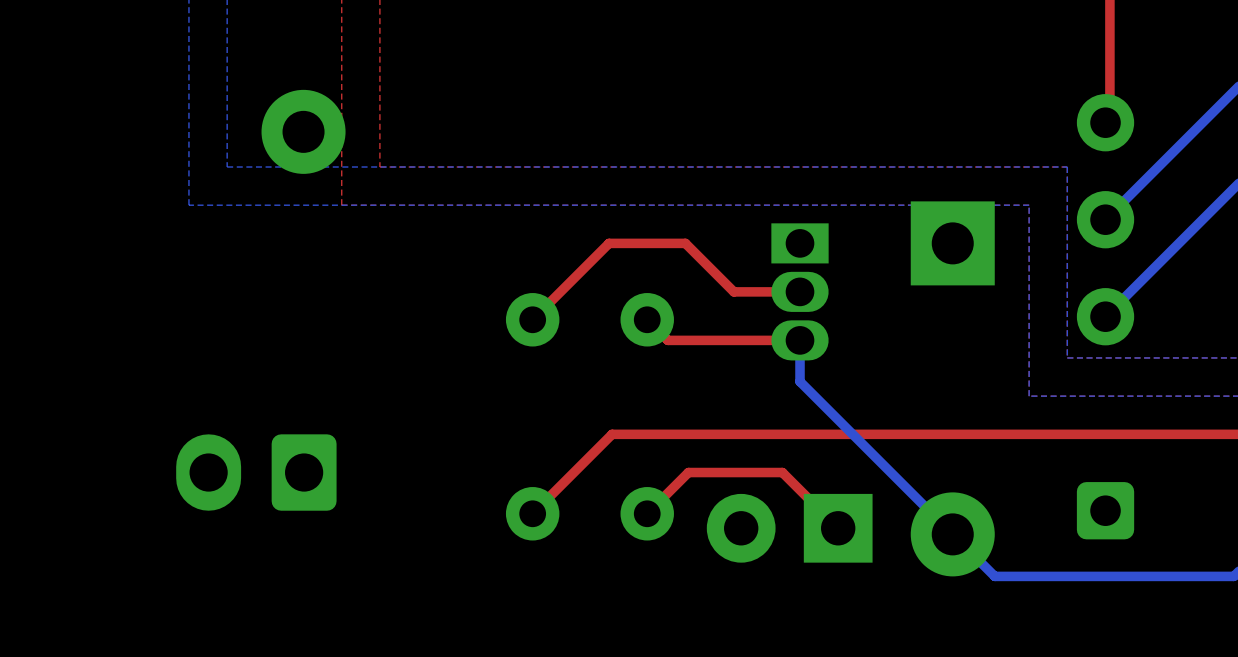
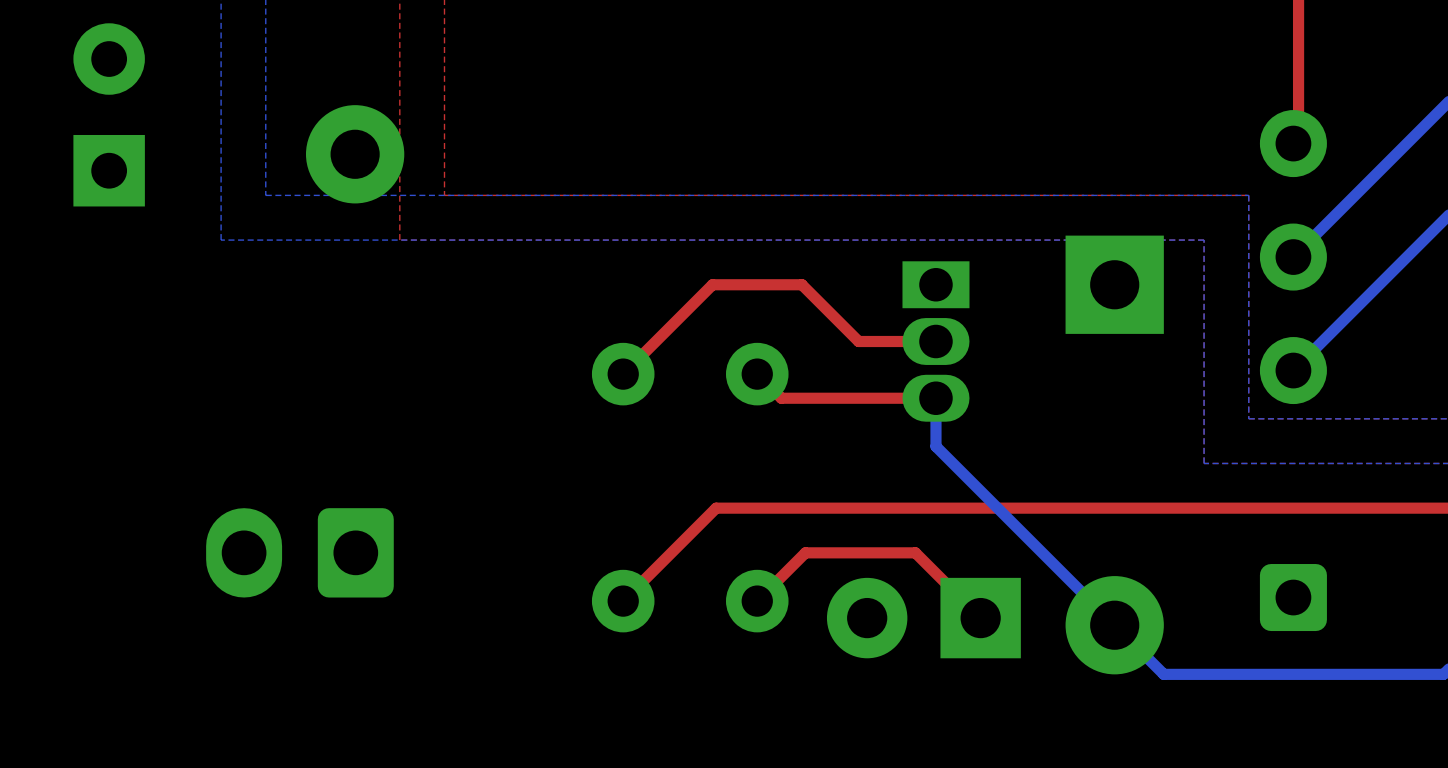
part: none -> (109, 114)

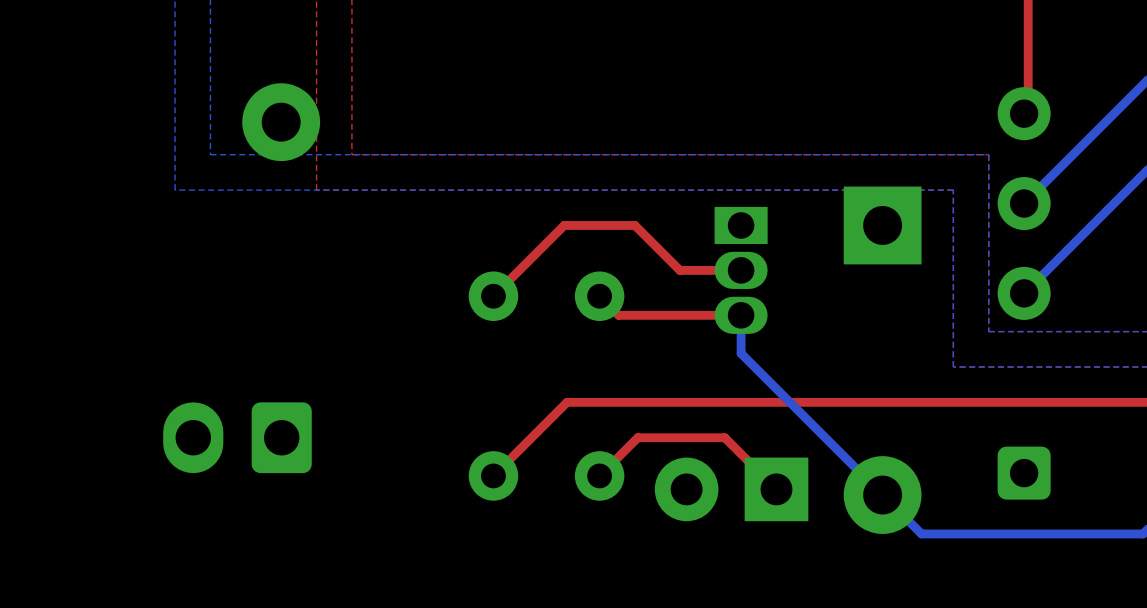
part: (109, 114) -> none

